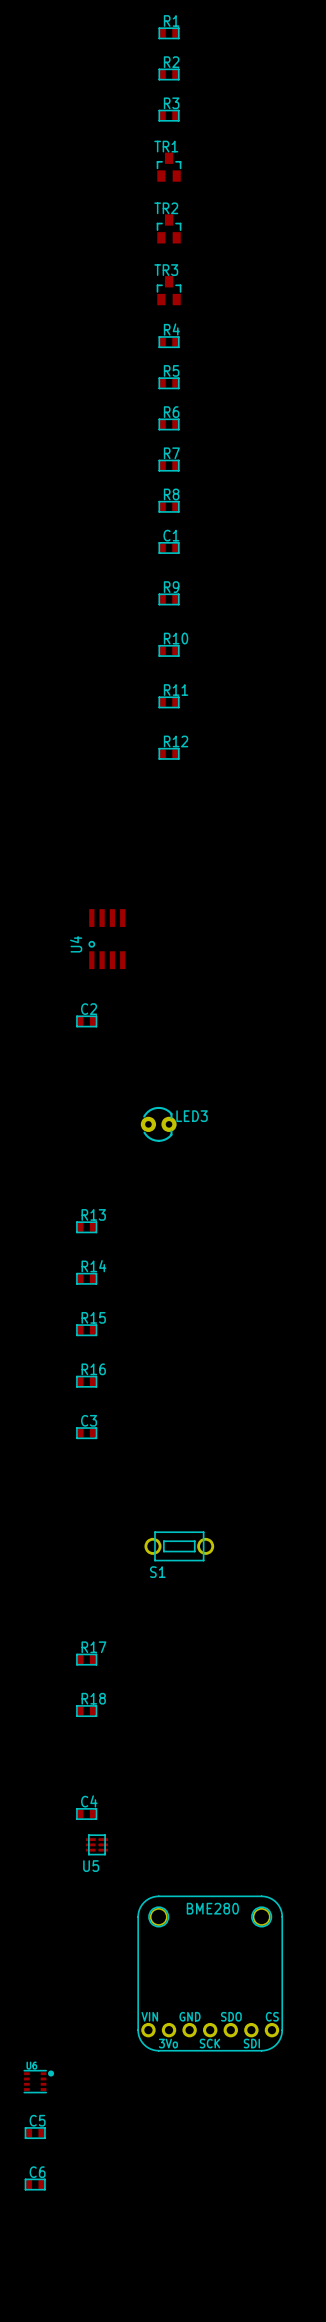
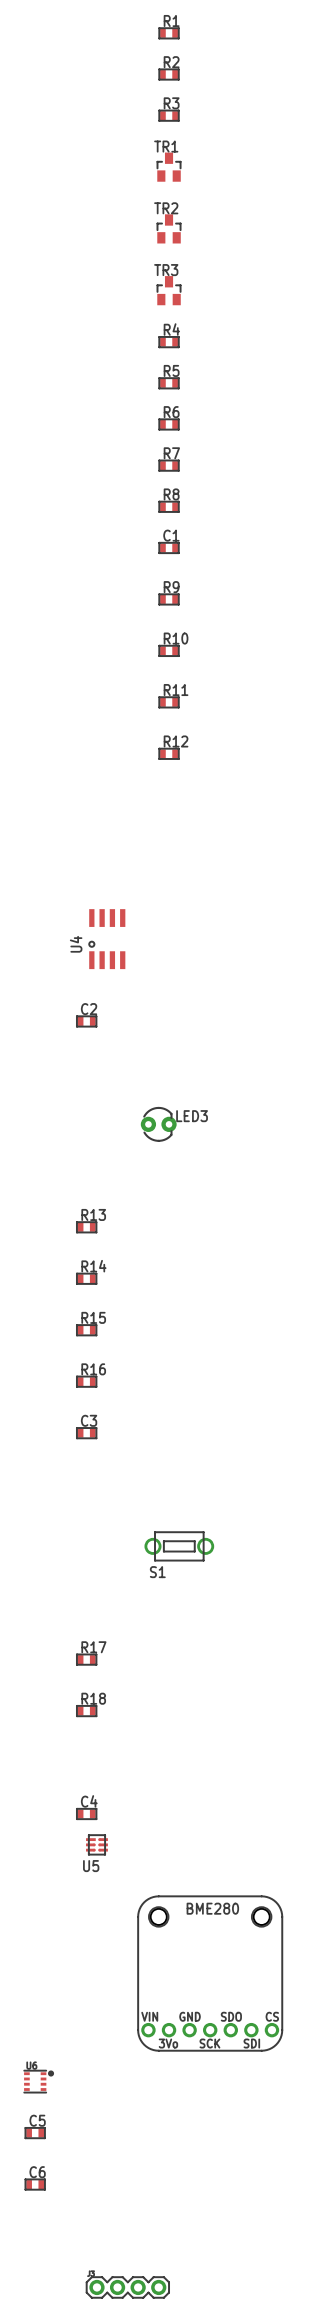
part: none -> (127, 2287)

